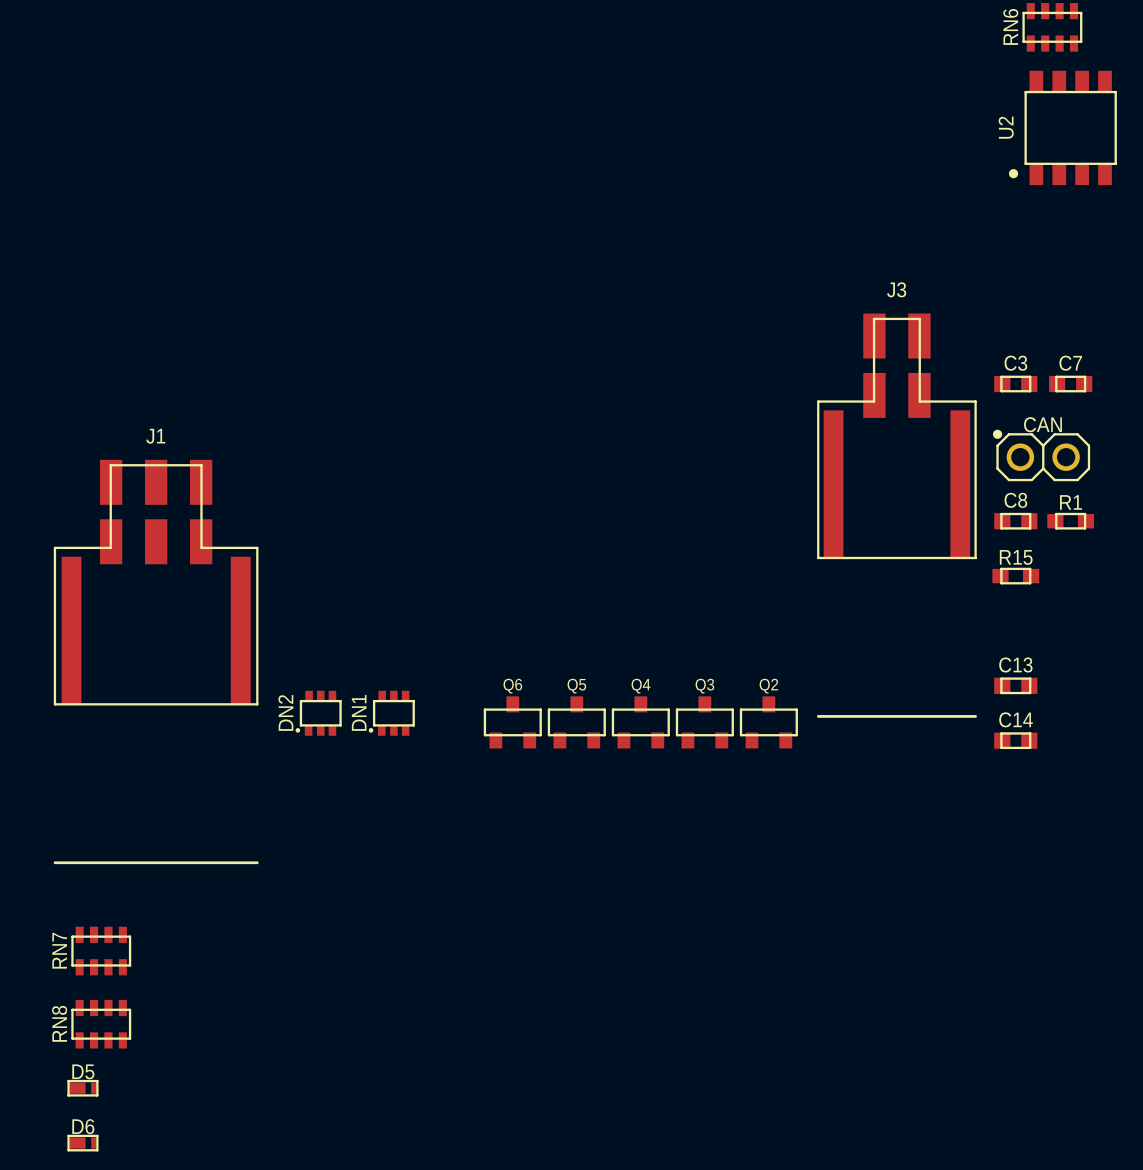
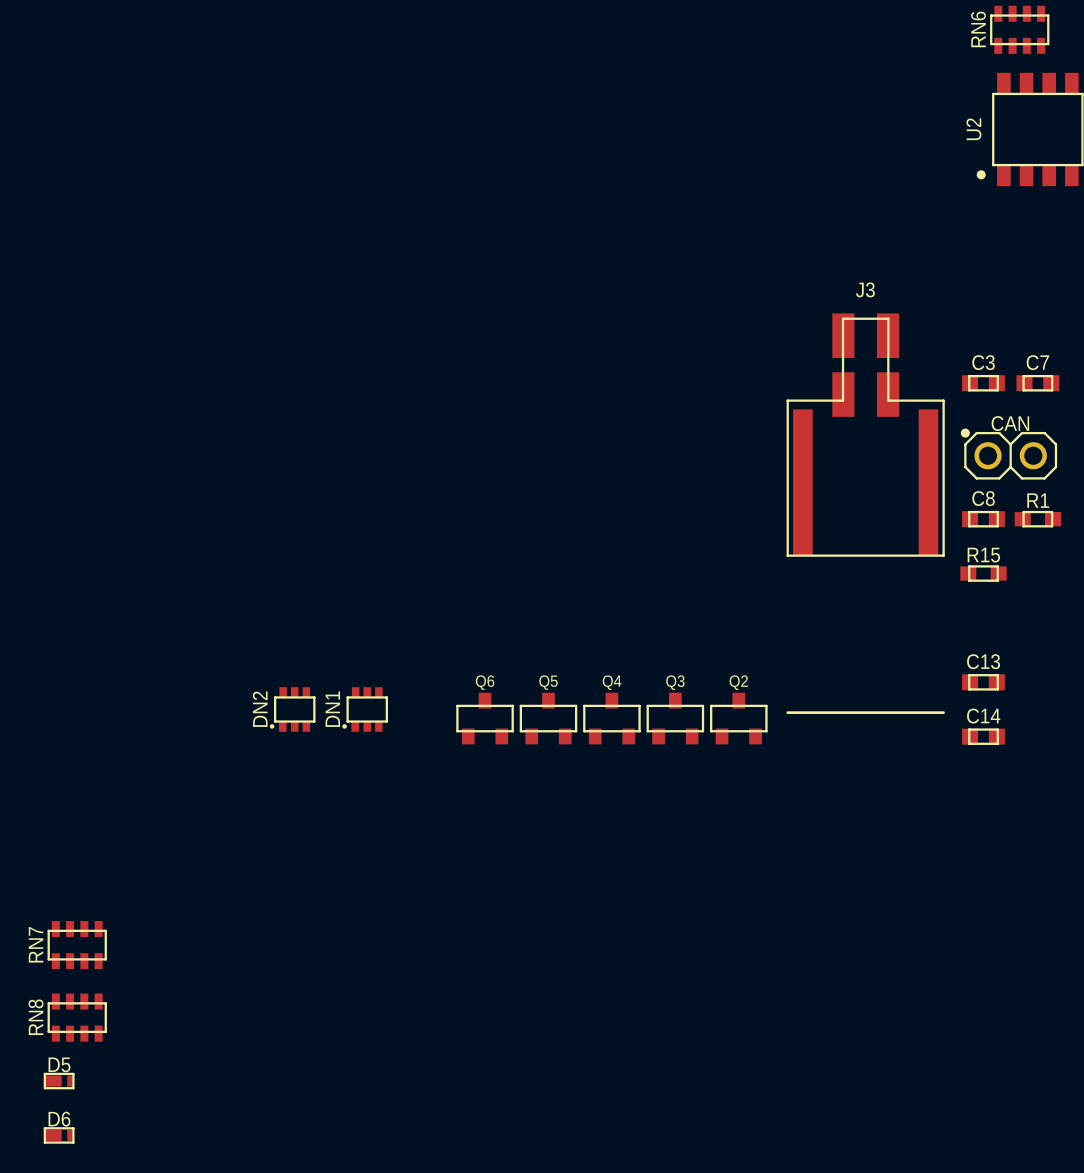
J1: (156, 661) -> none

